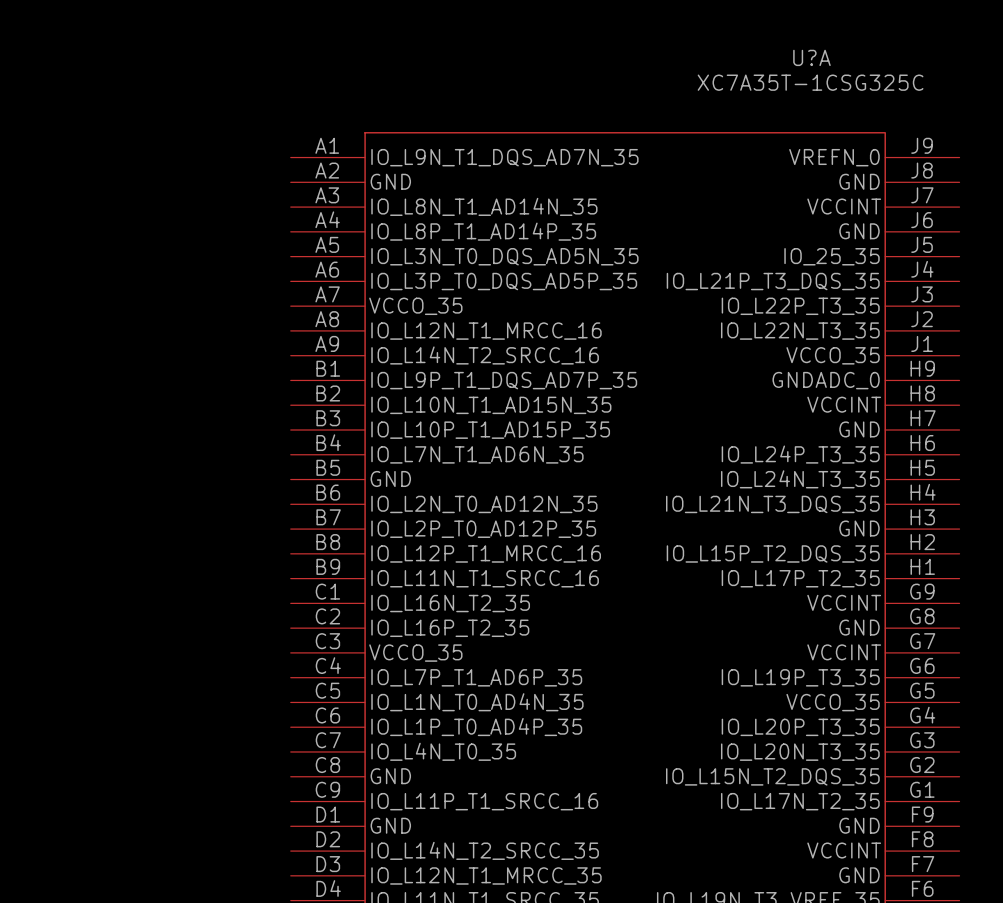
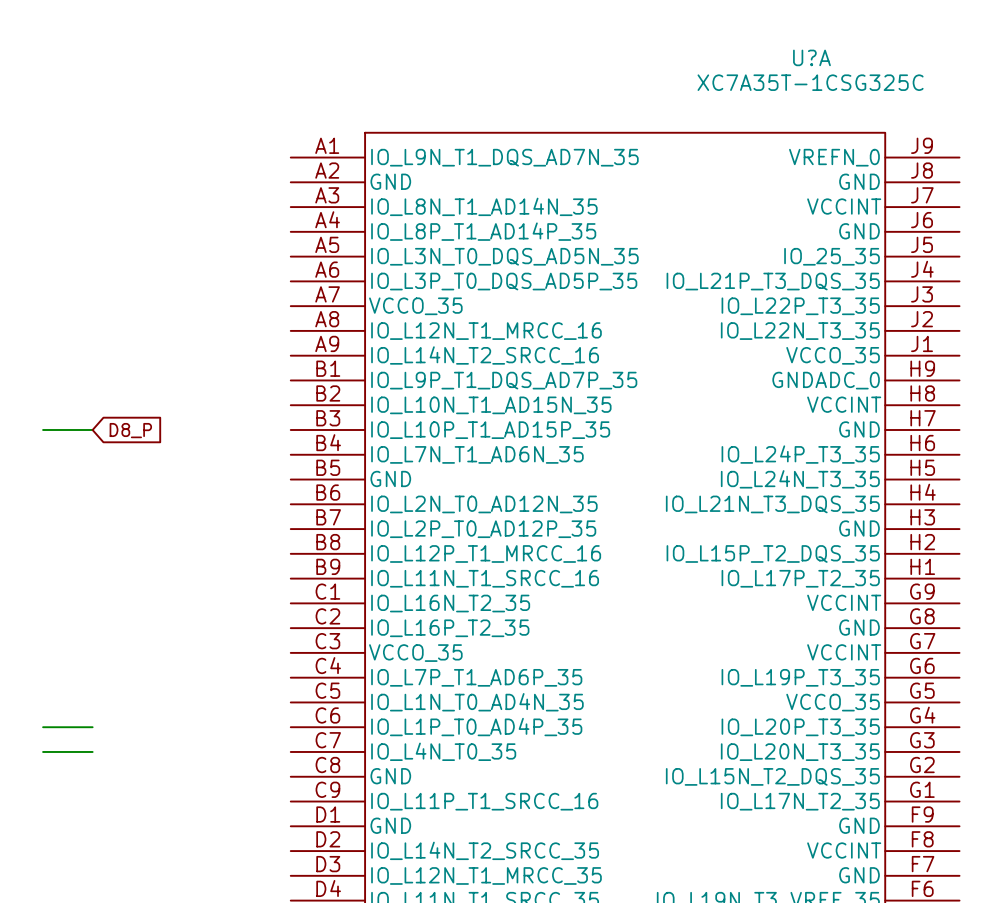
wire: none -> (43, 429) (92, 429)
global label: none -> D8_P (130, 430)
wire: none -> (43, 727) (92, 727)
wire: none -> (43, 751) (92, 751)

